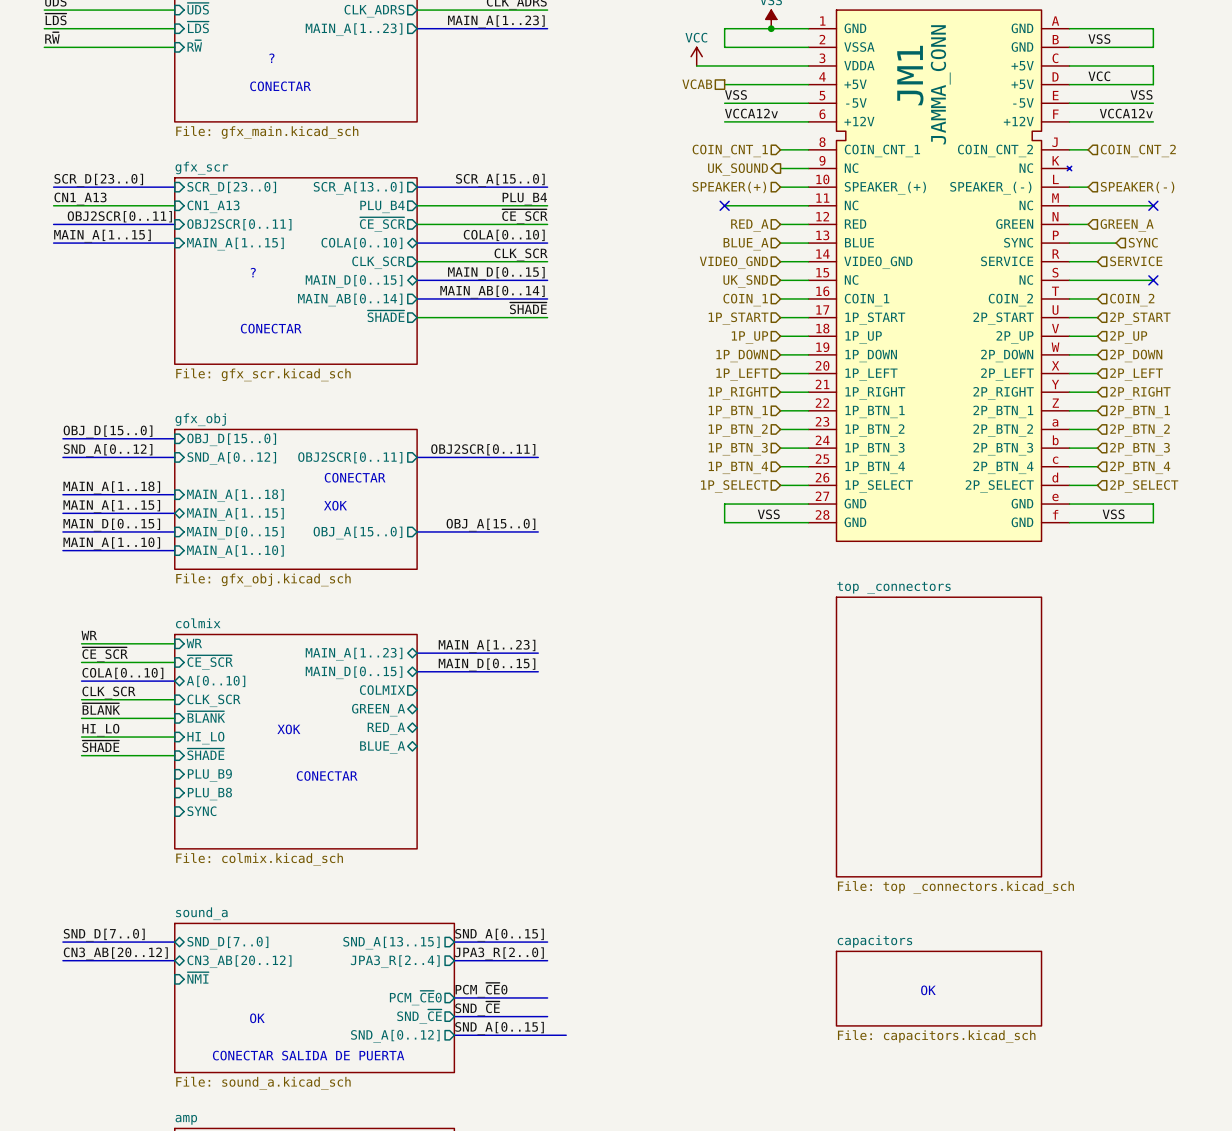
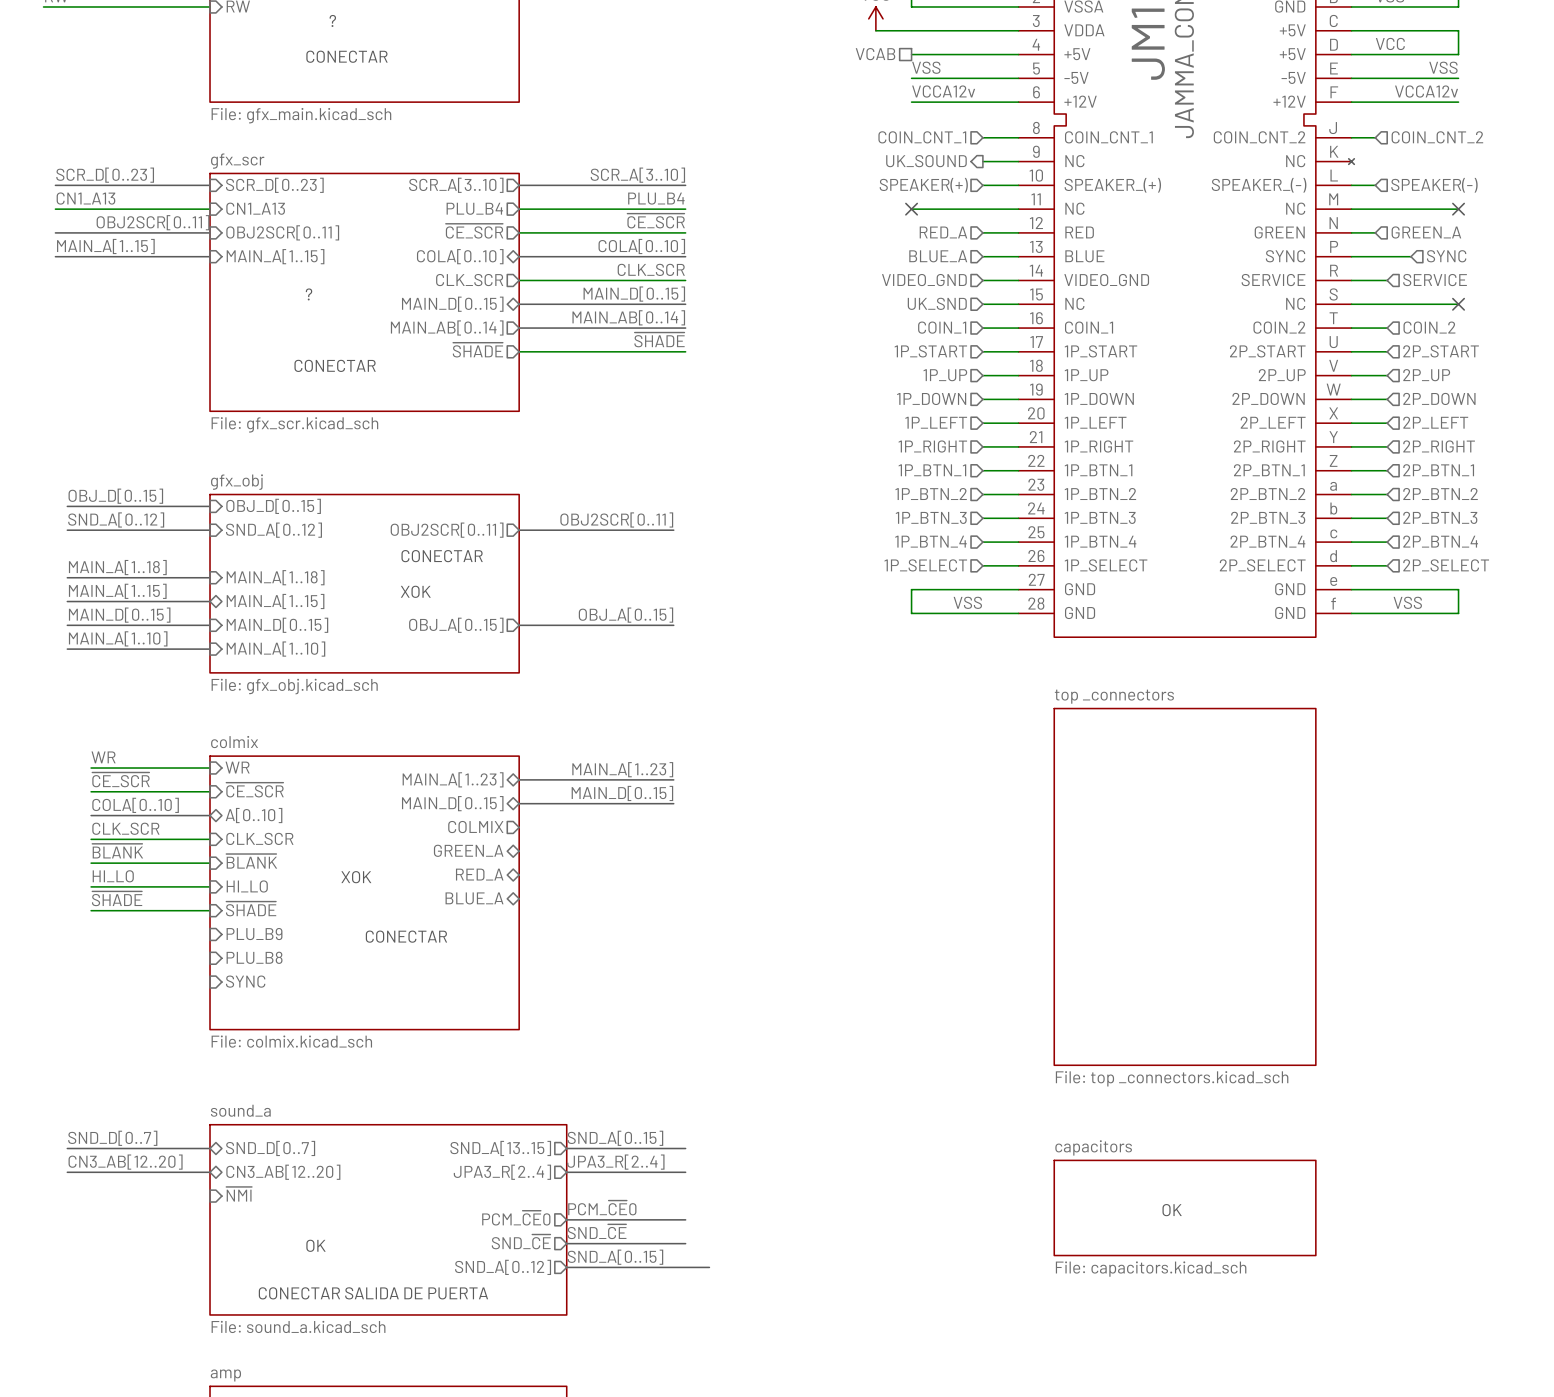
label: SCR_D[23..0] (98, 180) -> SCR_D[0..23] (105, 175)
label: SCR_A[15..0] (500, 180) -> SCR_A[3..10] (637, 175)
sheet pin: SCR_D[23..0] (231, 188) -> SCR_D[0..23] (274, 185)
sheet pin: SCR_A[13..0] (358, 188) -> SCR_A[3..10] (456, 185)
label: OBJ_D[15..0] (108, 431) -> OBJ_D[0..15] (115, 496)
sheet pin: OBJ_D[15..0] (231, 439) -> OBJ_D[0..15] (273, 506)
label: OBJ_A[15..0] (490, 524) -> OBJ_A[0..15] (625, 615)
sheet pin: OBJ_A[15..0] (358, 532) -> OBJ_A[0..15] (456, 625)
label: SND_D[7..0] (104, 935) -> SND_D[0..7] (112, 1138)
sheet pin: SND_D[7..0] (227, 943) -> SND_D[0..7] (270, 1148)
label: CN3_AB[20..12] (115, 953) -> CN3_AB[12..20] (125, 1162)
label: JPA3_R[2..0] (499, 953) -> JPA3_R[2..4] (615, 1162)
sheet pin: CN3_AB[20..12] (239, 961) -> CN3_AB[12..20] (283, 1172)

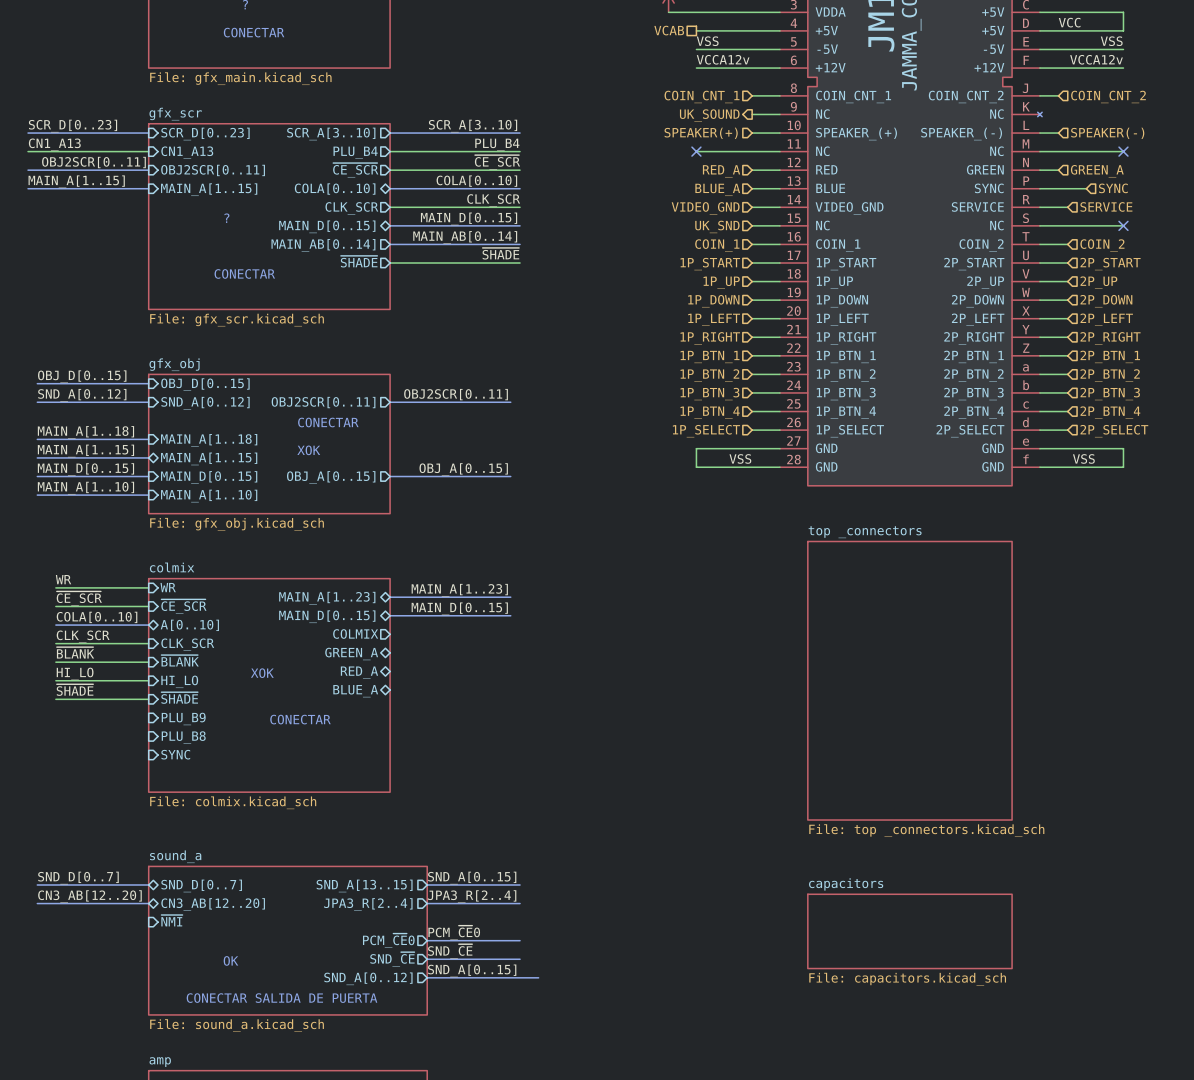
text: OK (1172, 1210) -> none

